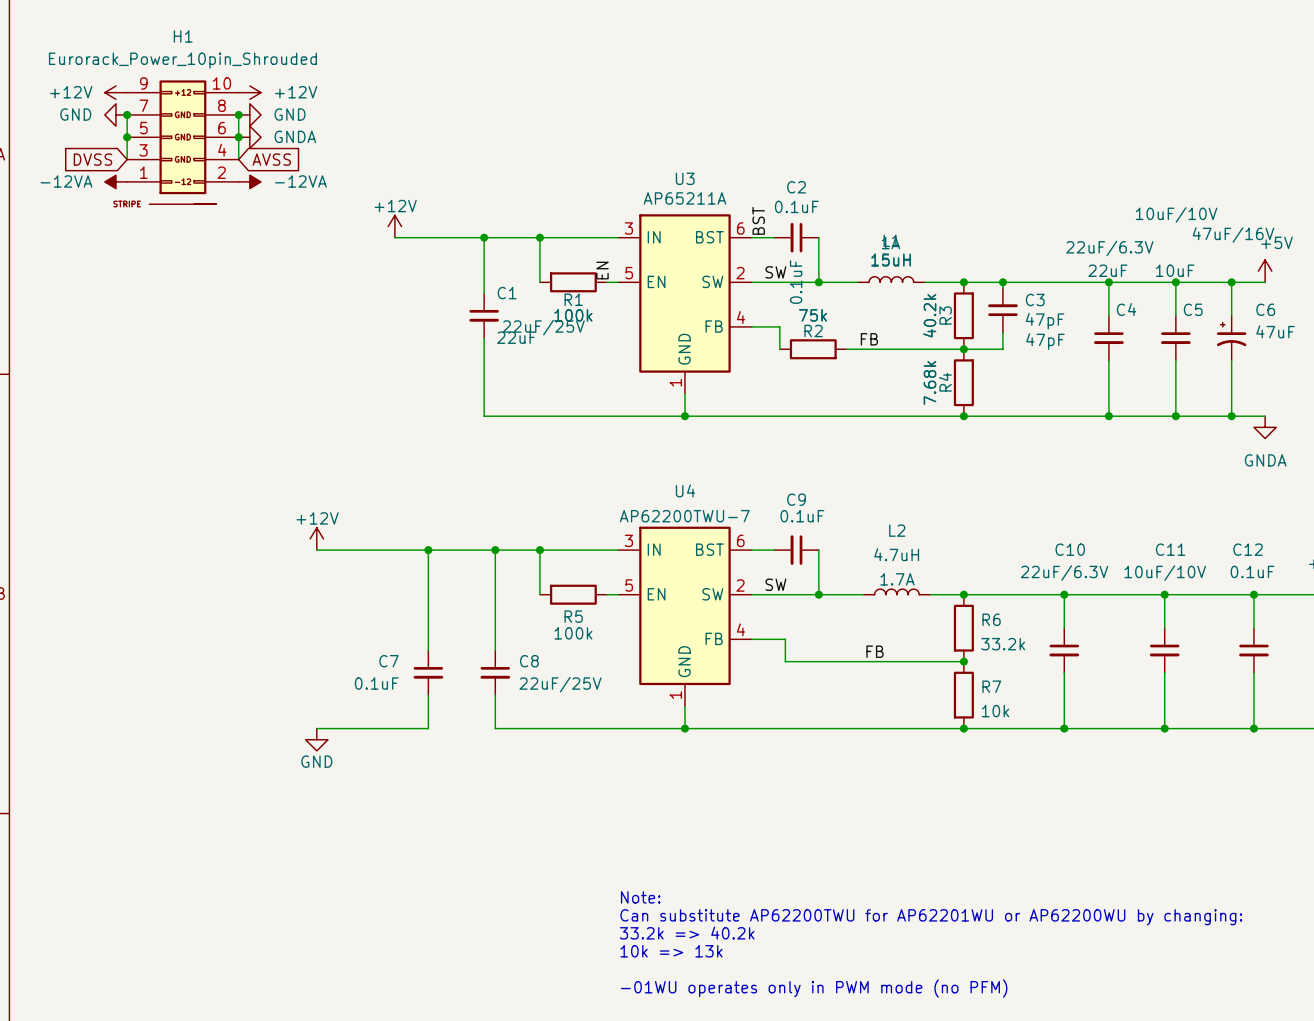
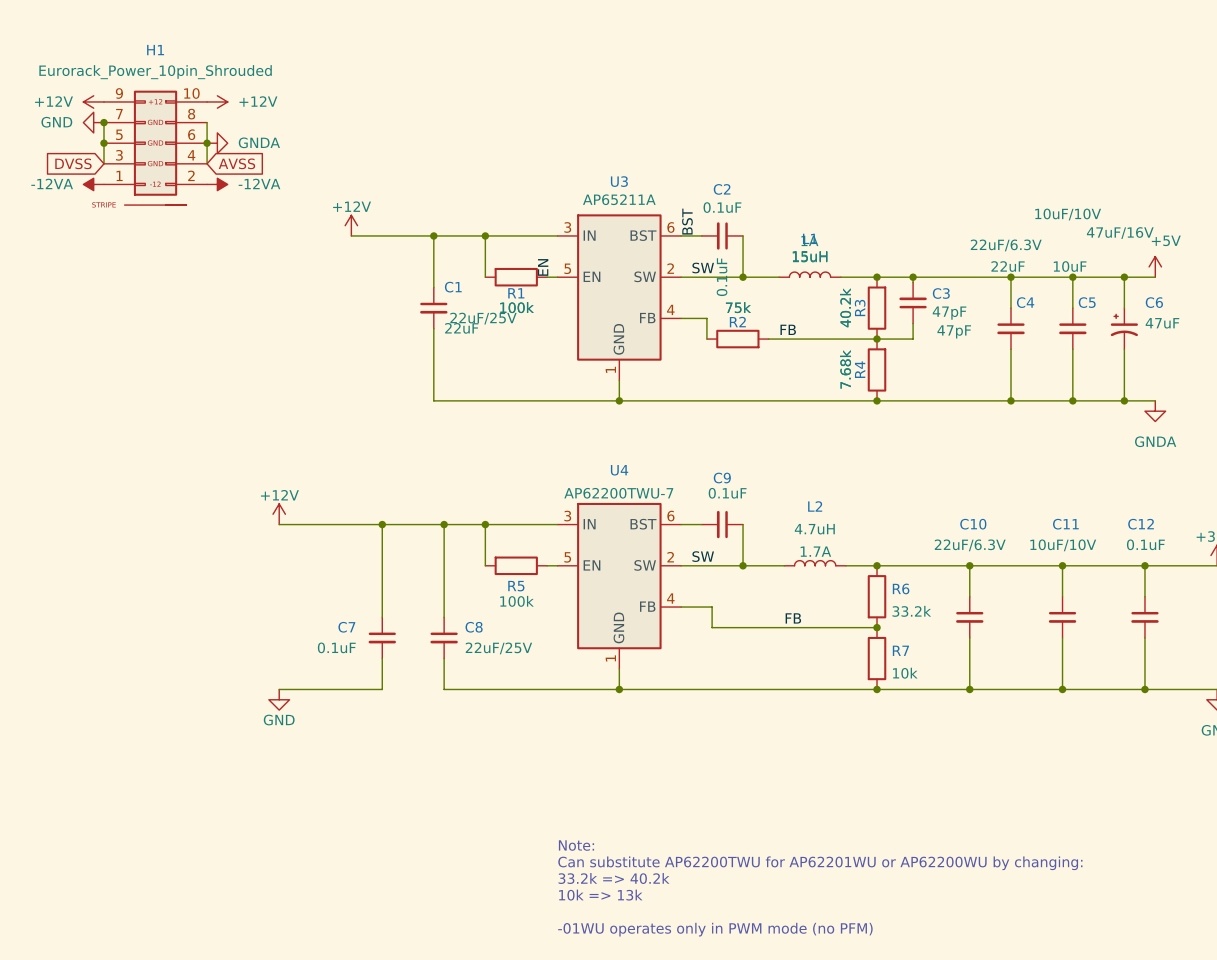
junction: (238, 114) -> none
power symbol: GND (249, 114) -> none

